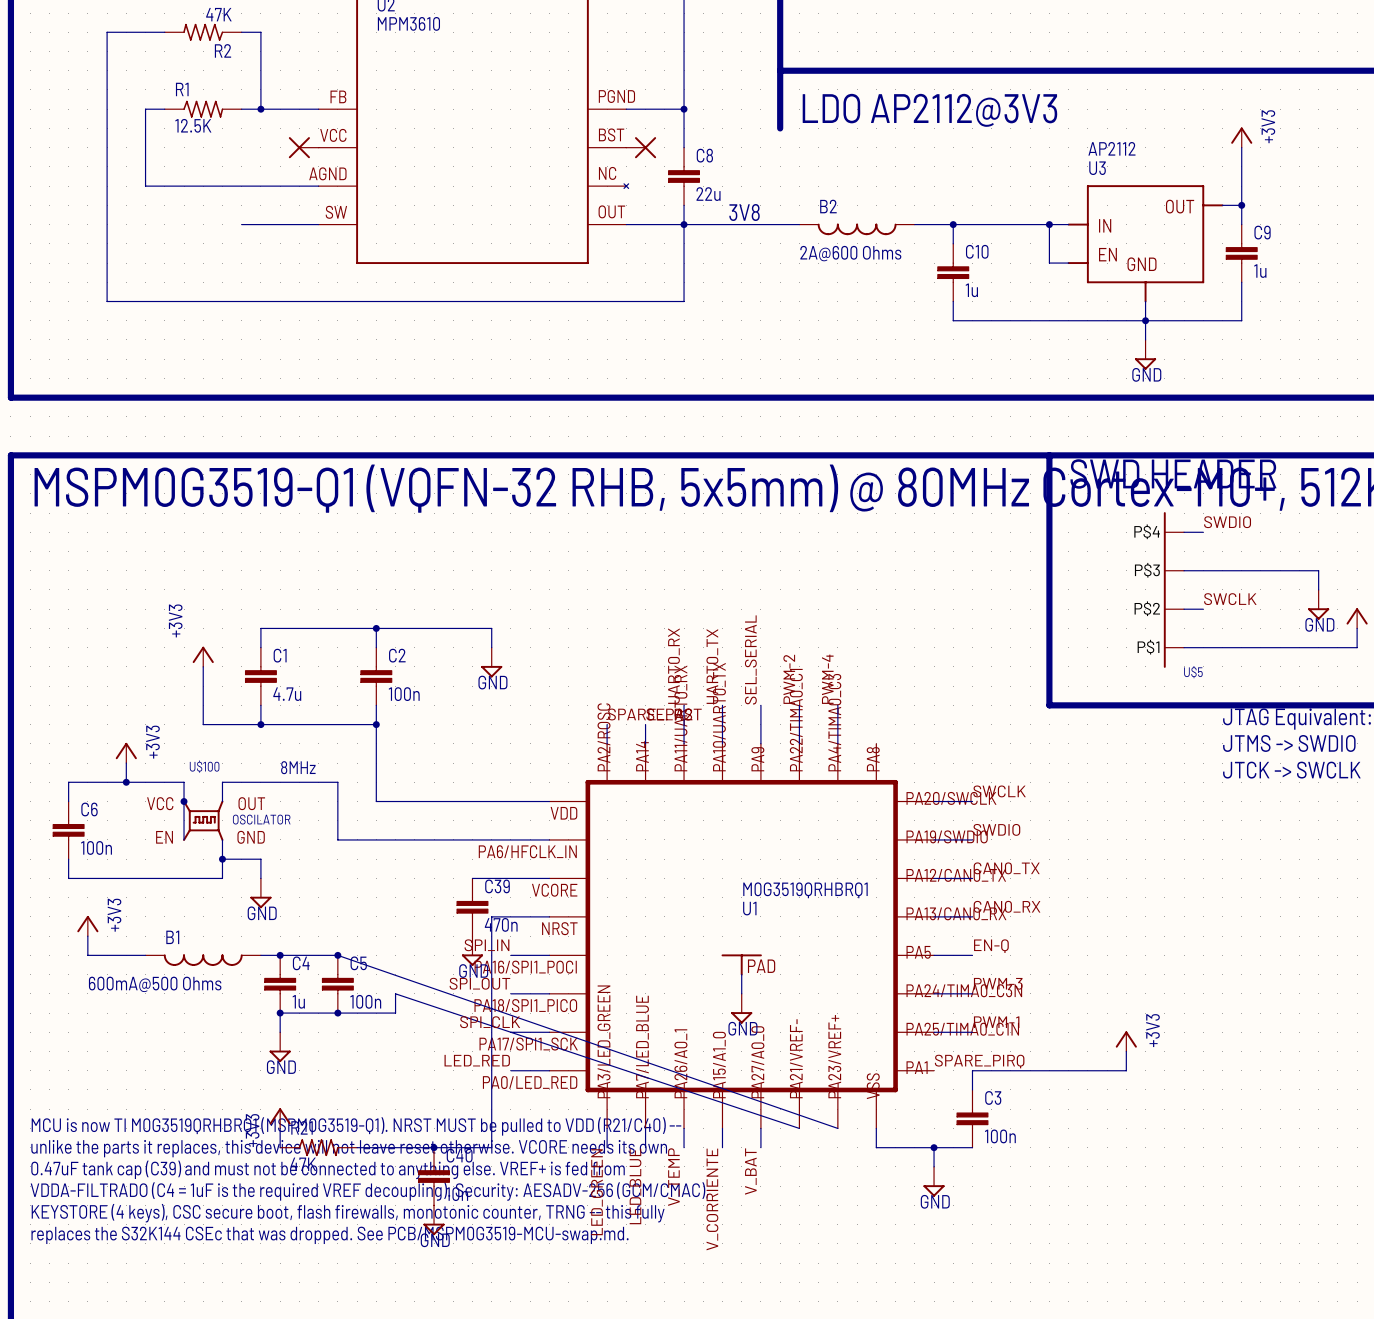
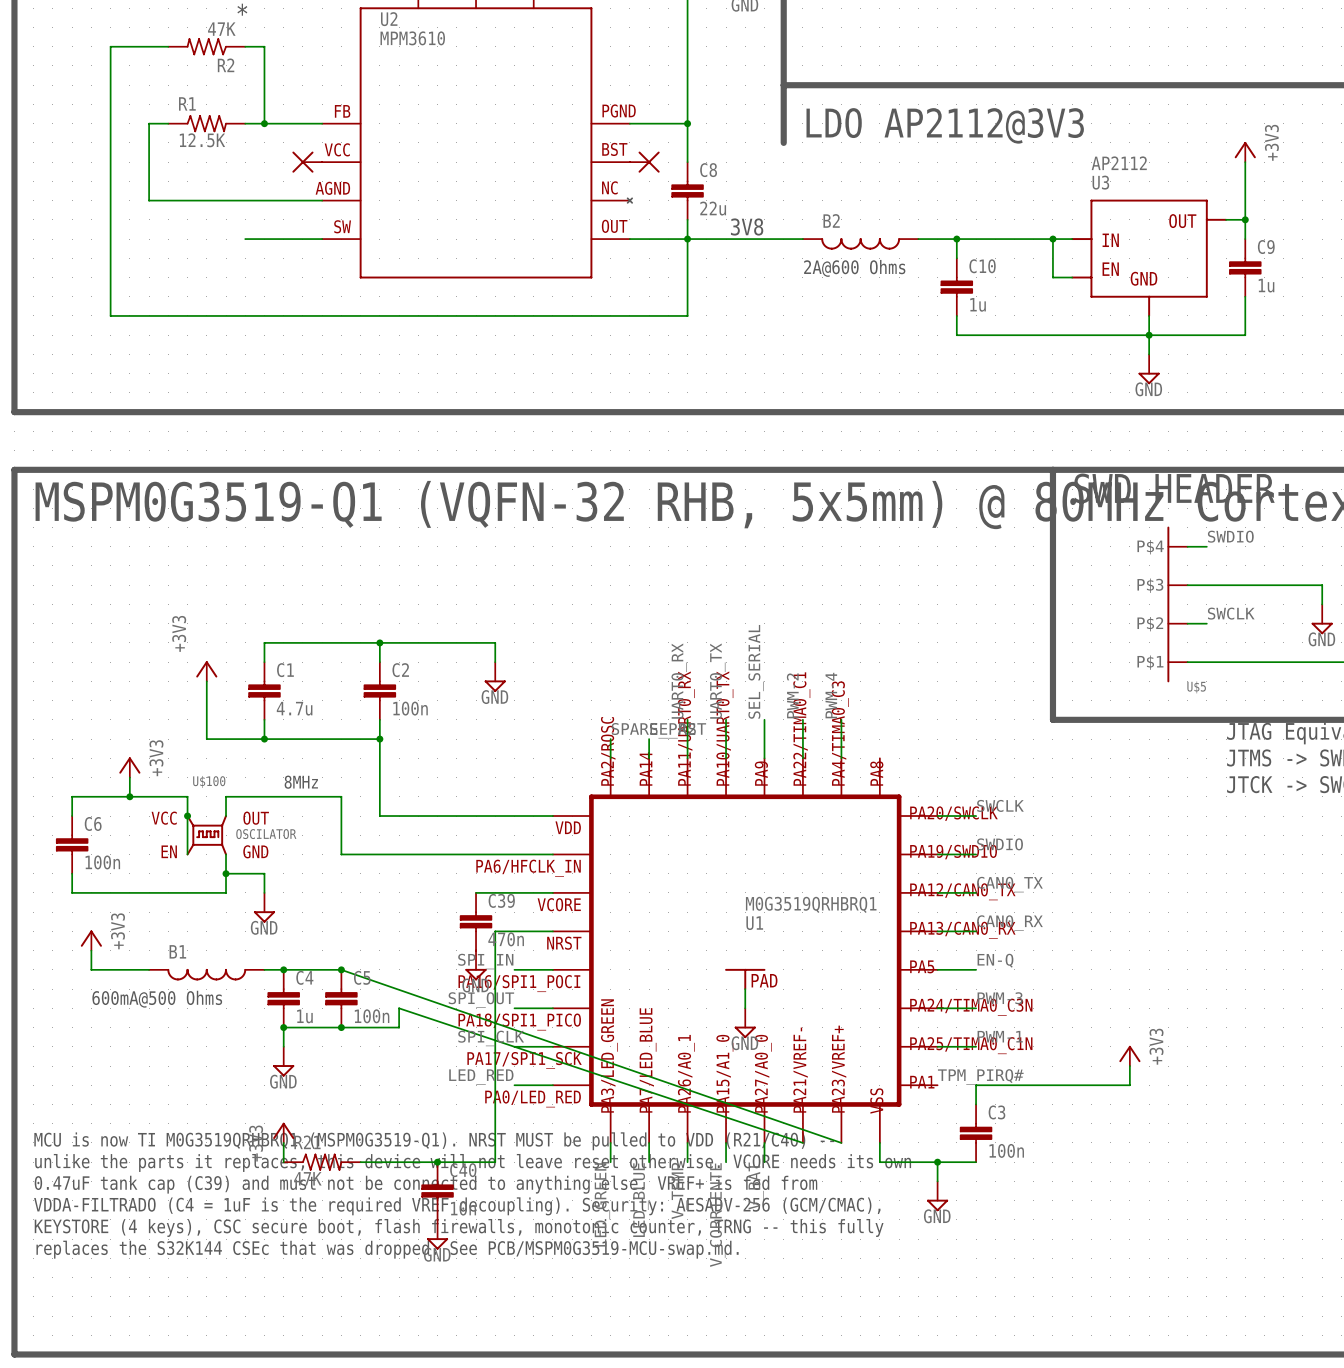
label: SPARE_PIRQ (979, 1061) -> TPM_PIRQ# (980, 1076)

